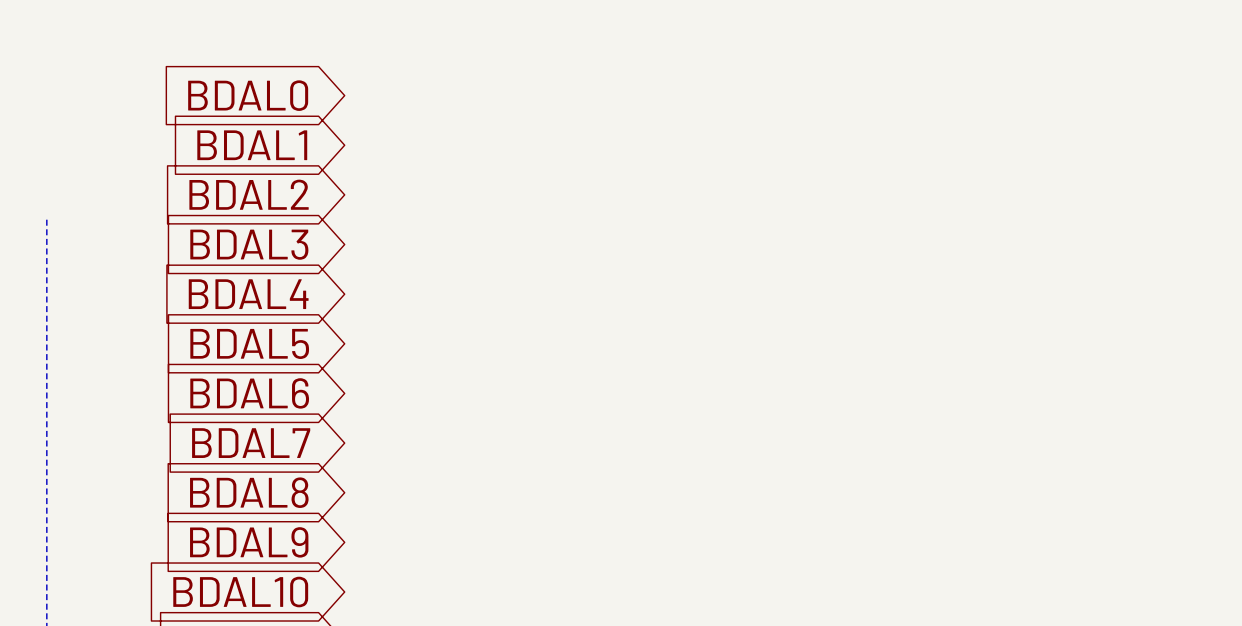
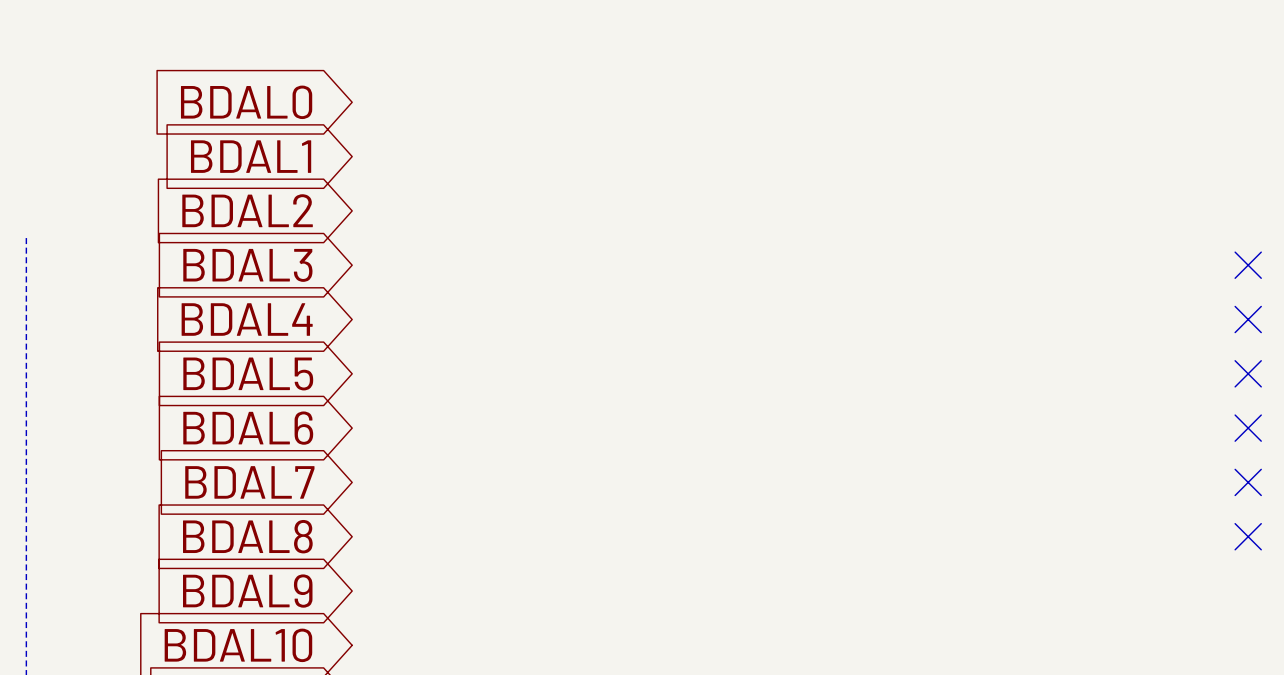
no-connect mark: none -> (1248, 265)
no-connect mark: none -> (1248, 319)
no-connect mark: none -> (1248, 373)
no-connect mark: none -> (1248, 428)
no-connect mark: none -> (1248, 482)
no-connect mark: none -> (1248, 536)

